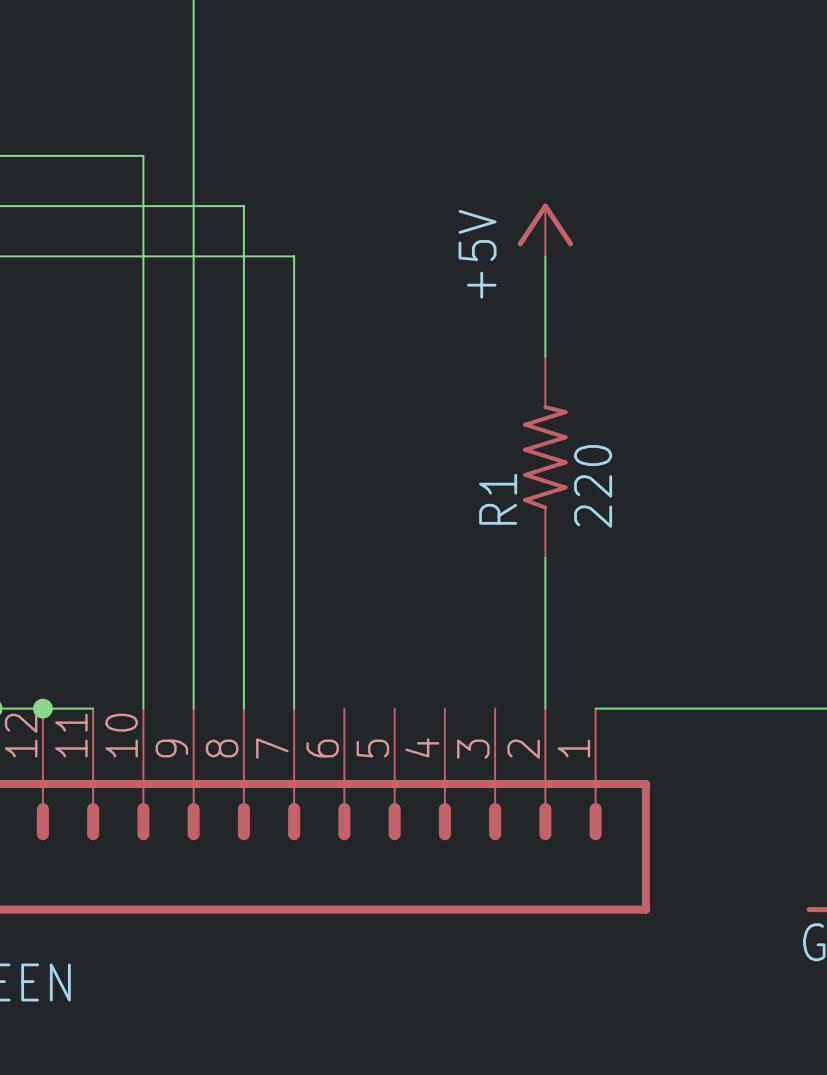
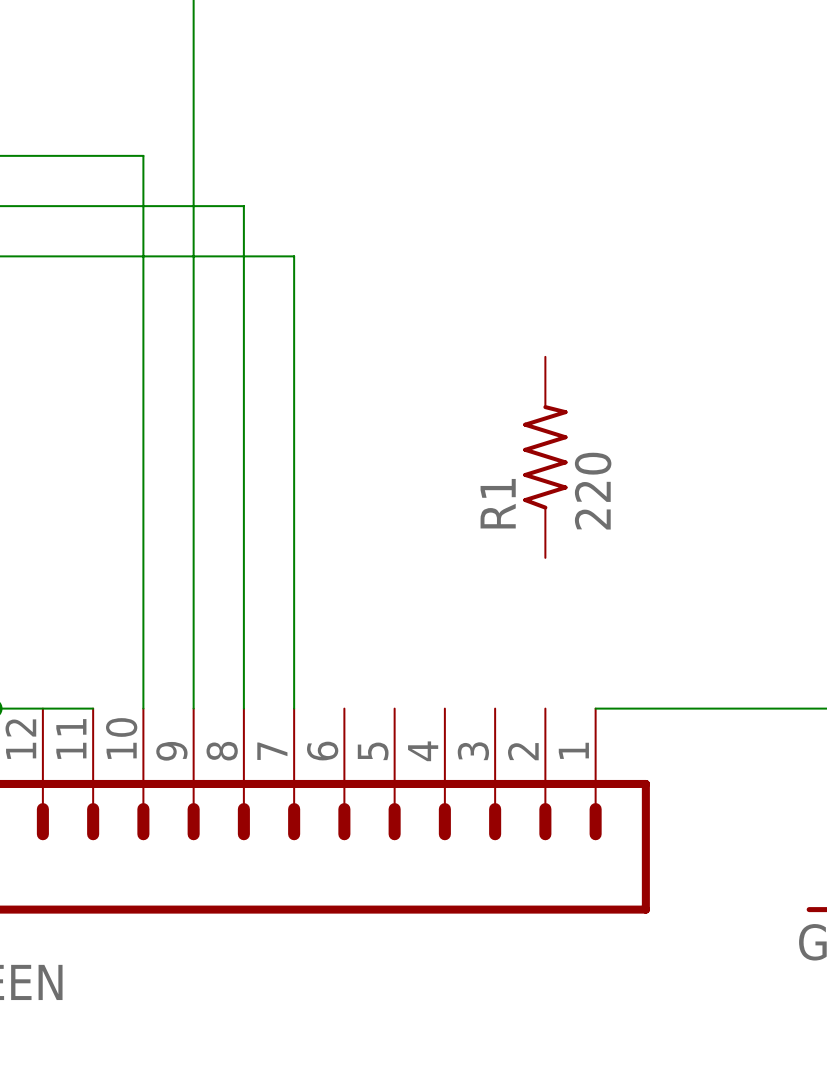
power symbol: +5V (545, 229) -> none
wire: (545, 256) (545, 356) -> none
wire: (545, 557) (545, 708) -> none
junction: (42, 708) -> none

